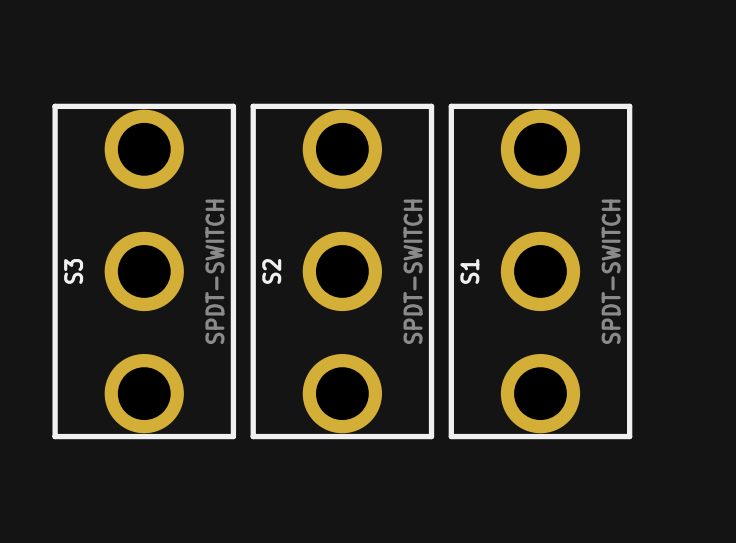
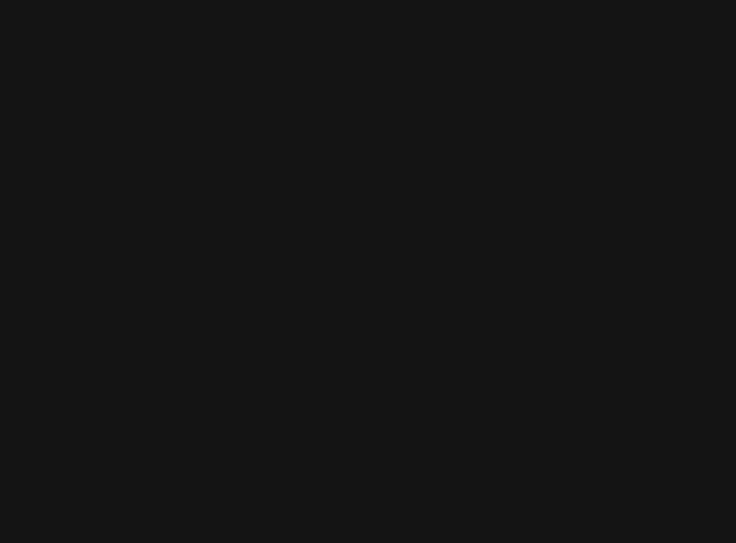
S3: SPDT-SWITCH (144, 271) -> none
S2: SPDT-SWITCH (342, 271) -> none
S1: SPDT-SWITCH (540, 271) -> none

